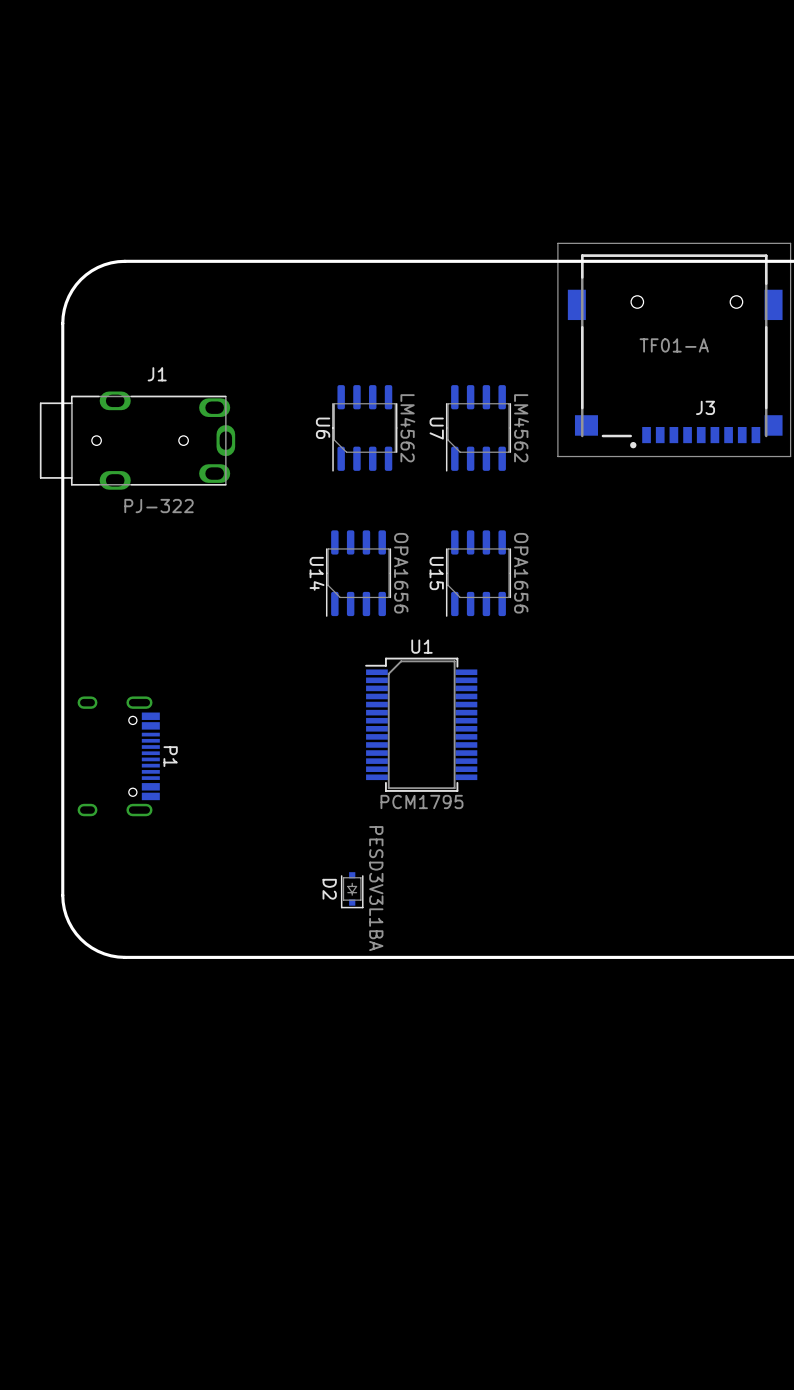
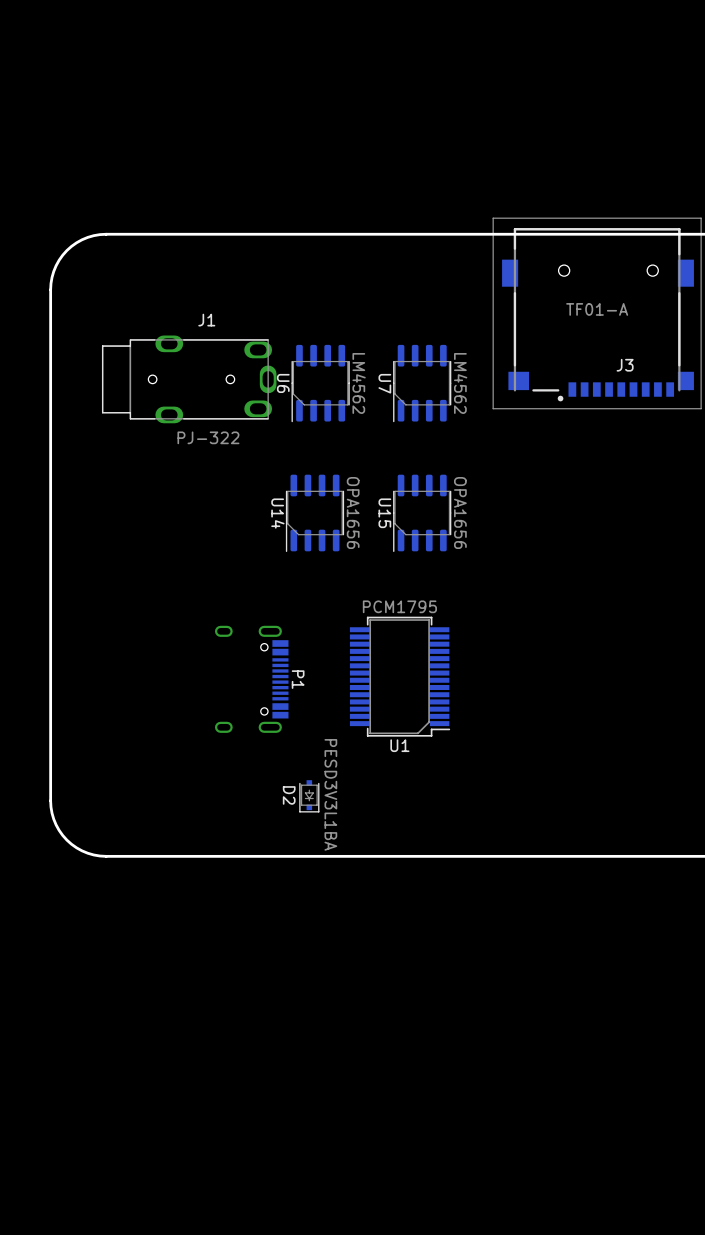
J1 position: (137, 440) -> (189, 379)
U1 rotation: 0° (421, 724) -> 180° (400, 676)
P1 position: (118, 756) -> (251, 679)

